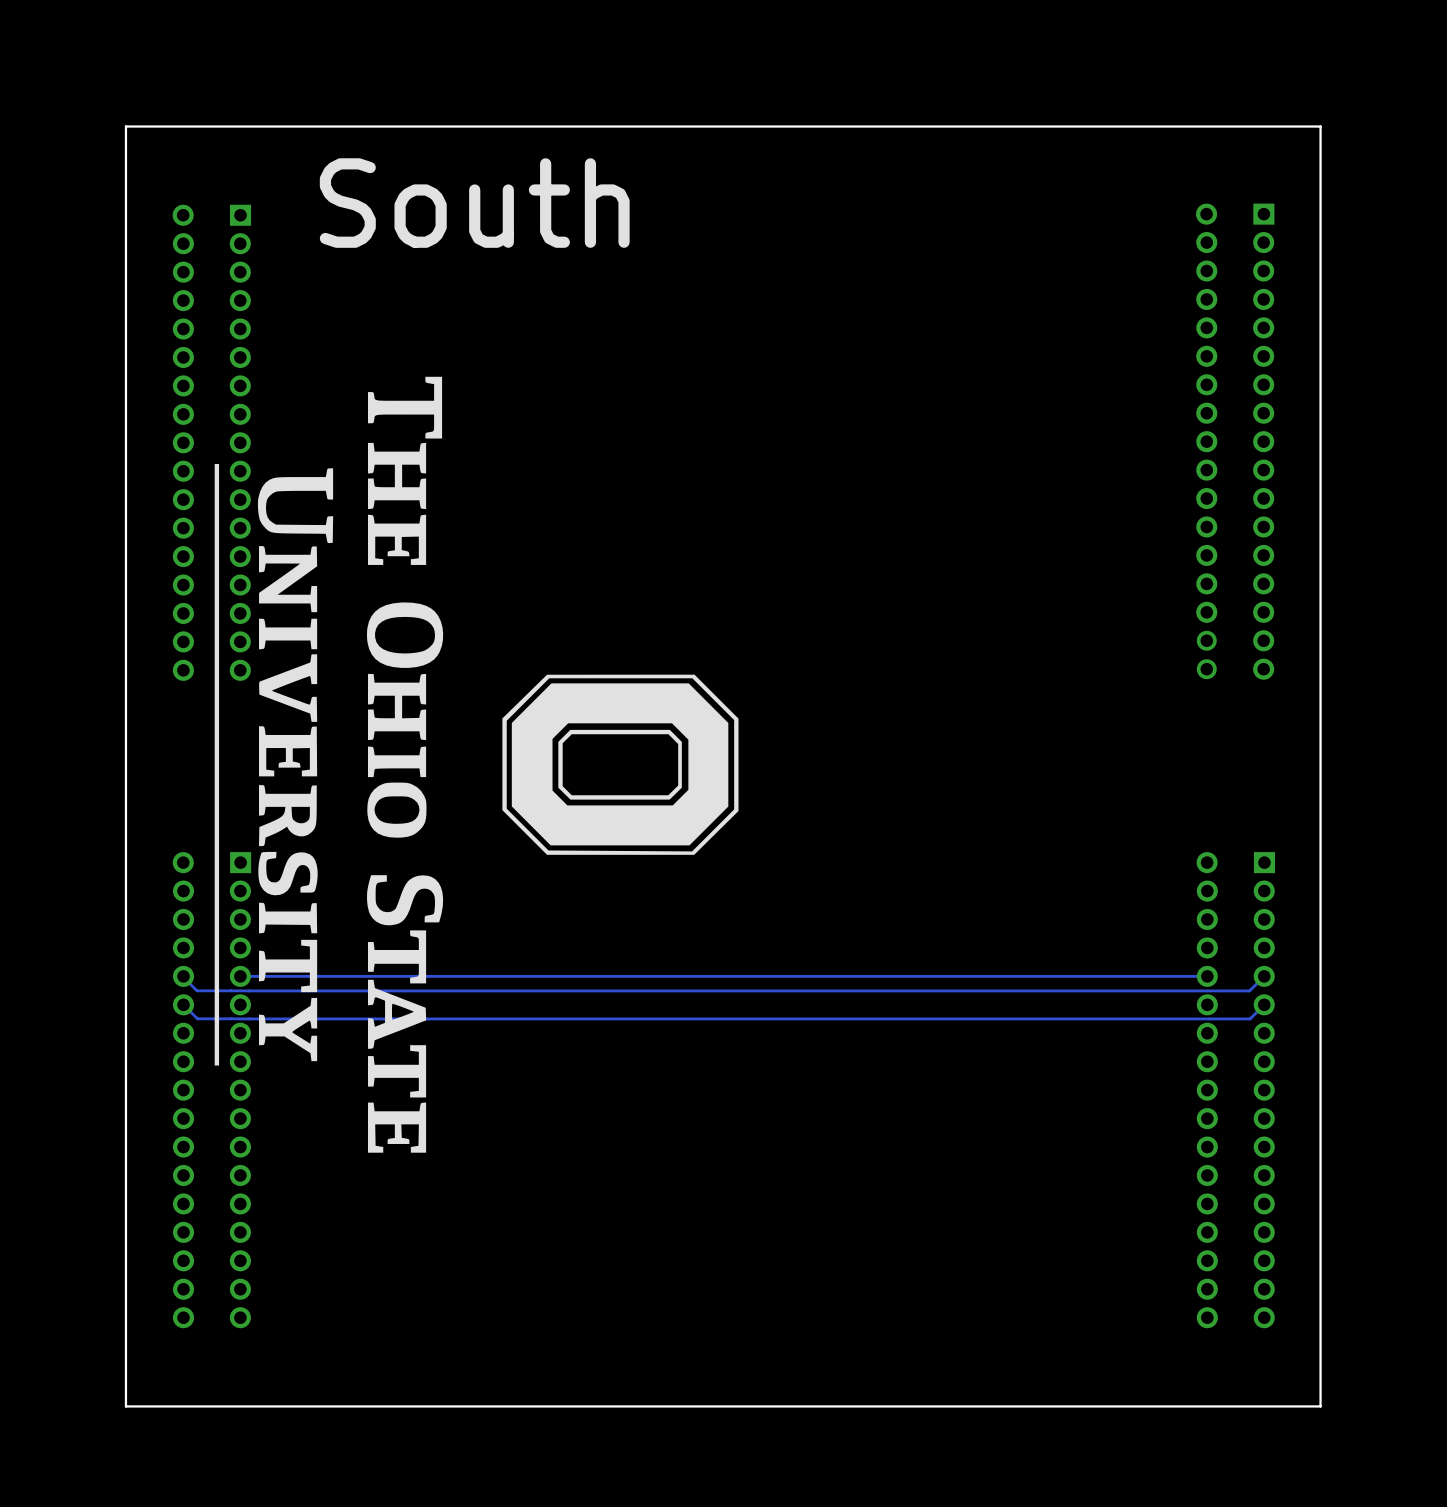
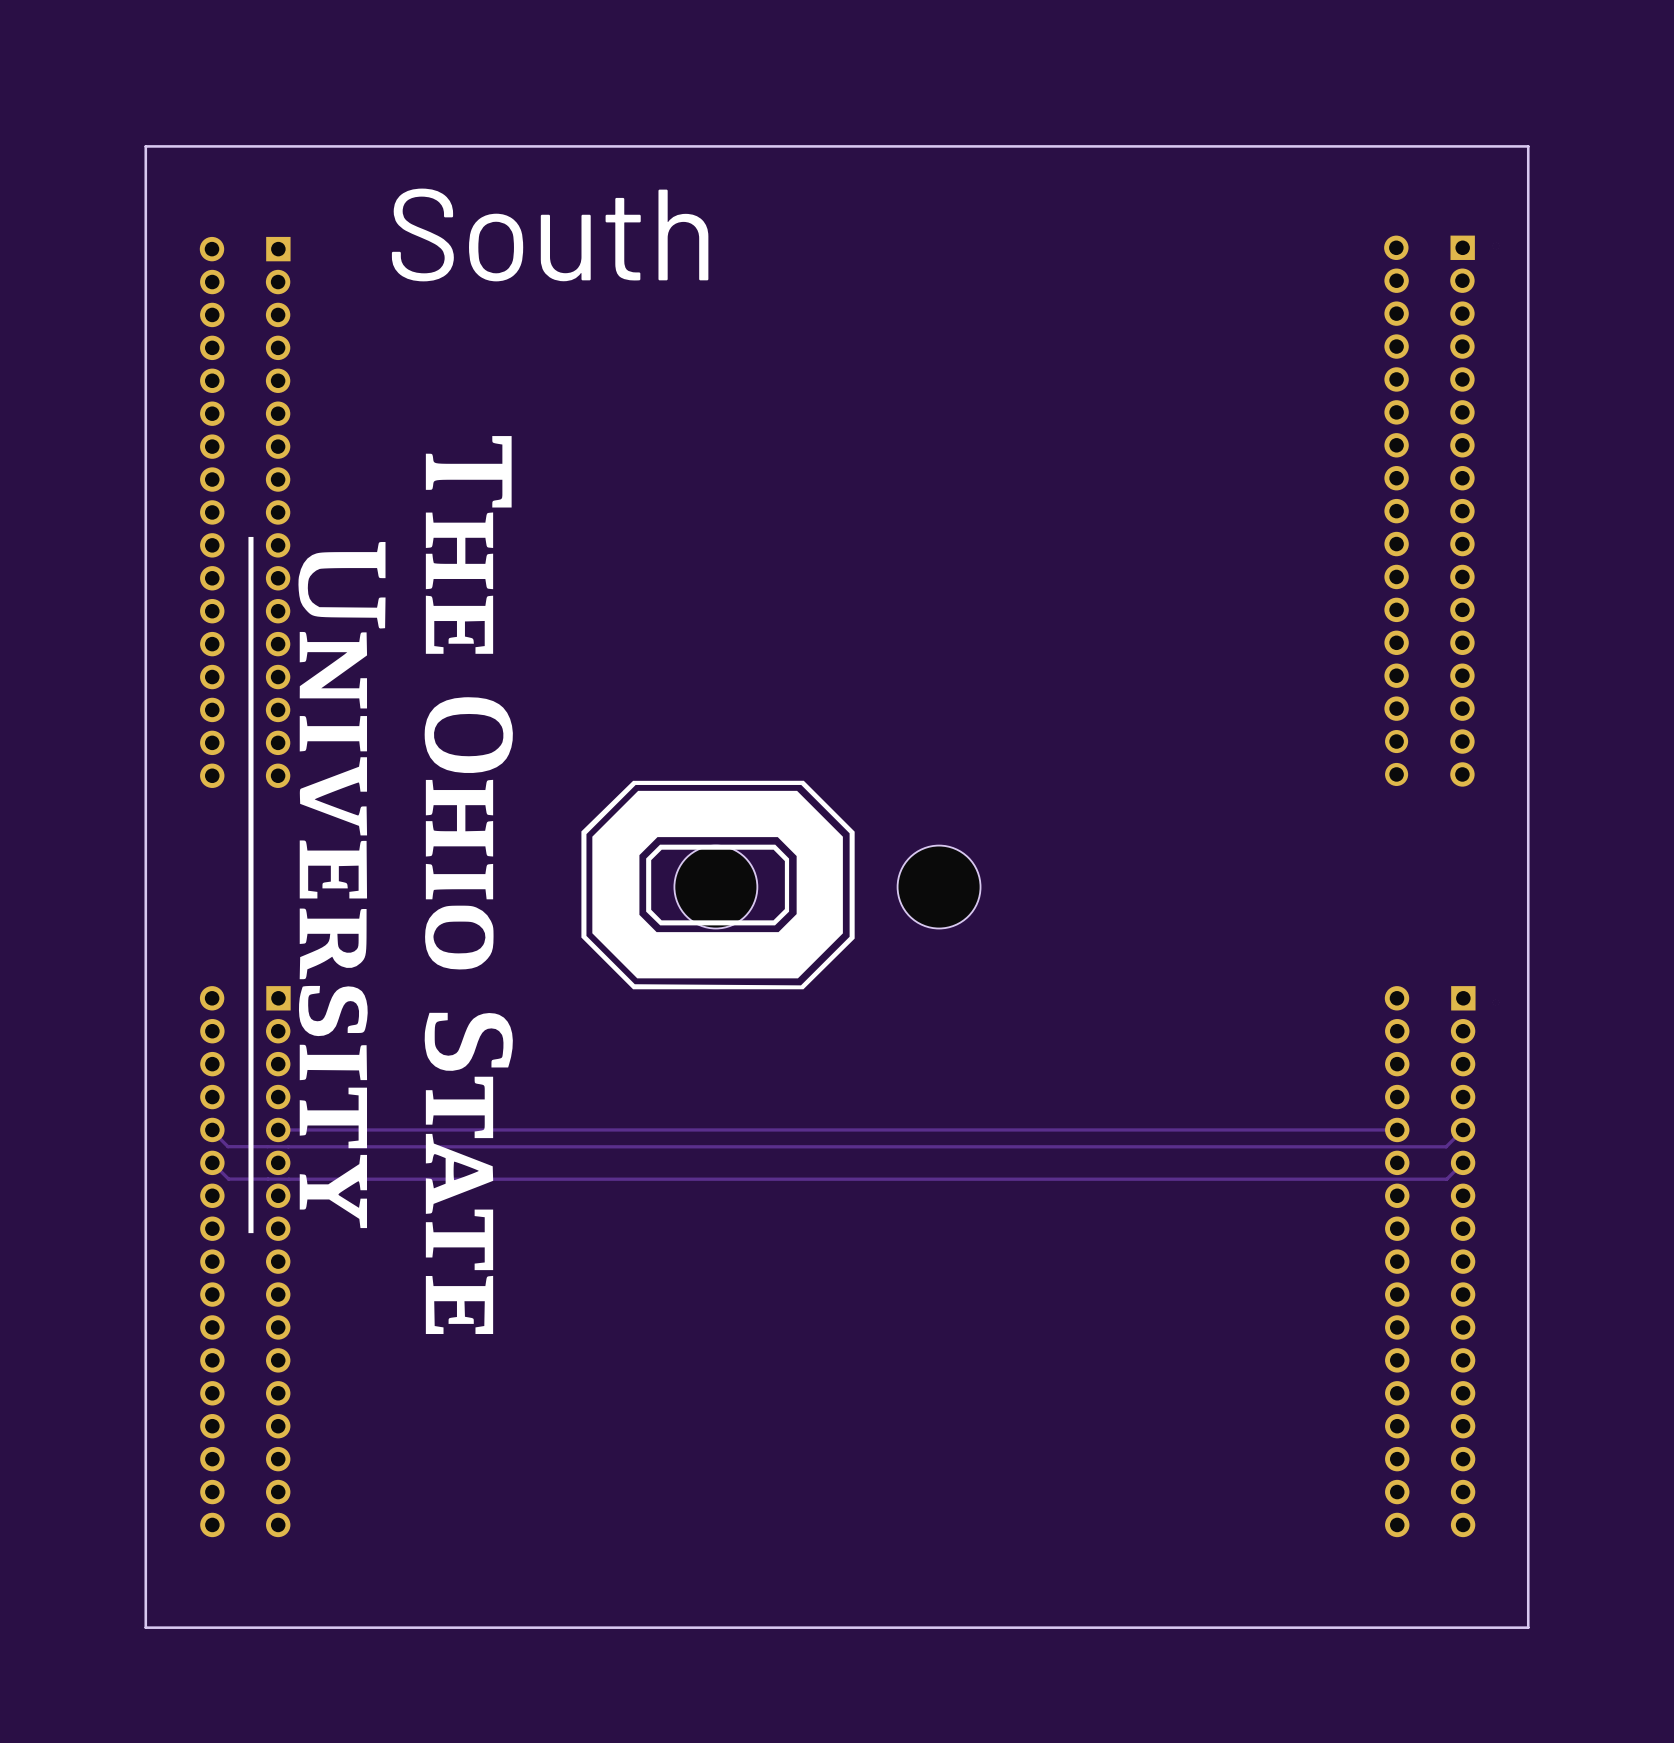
part: none -> (715, 887)
part: none -> (939, 887)

